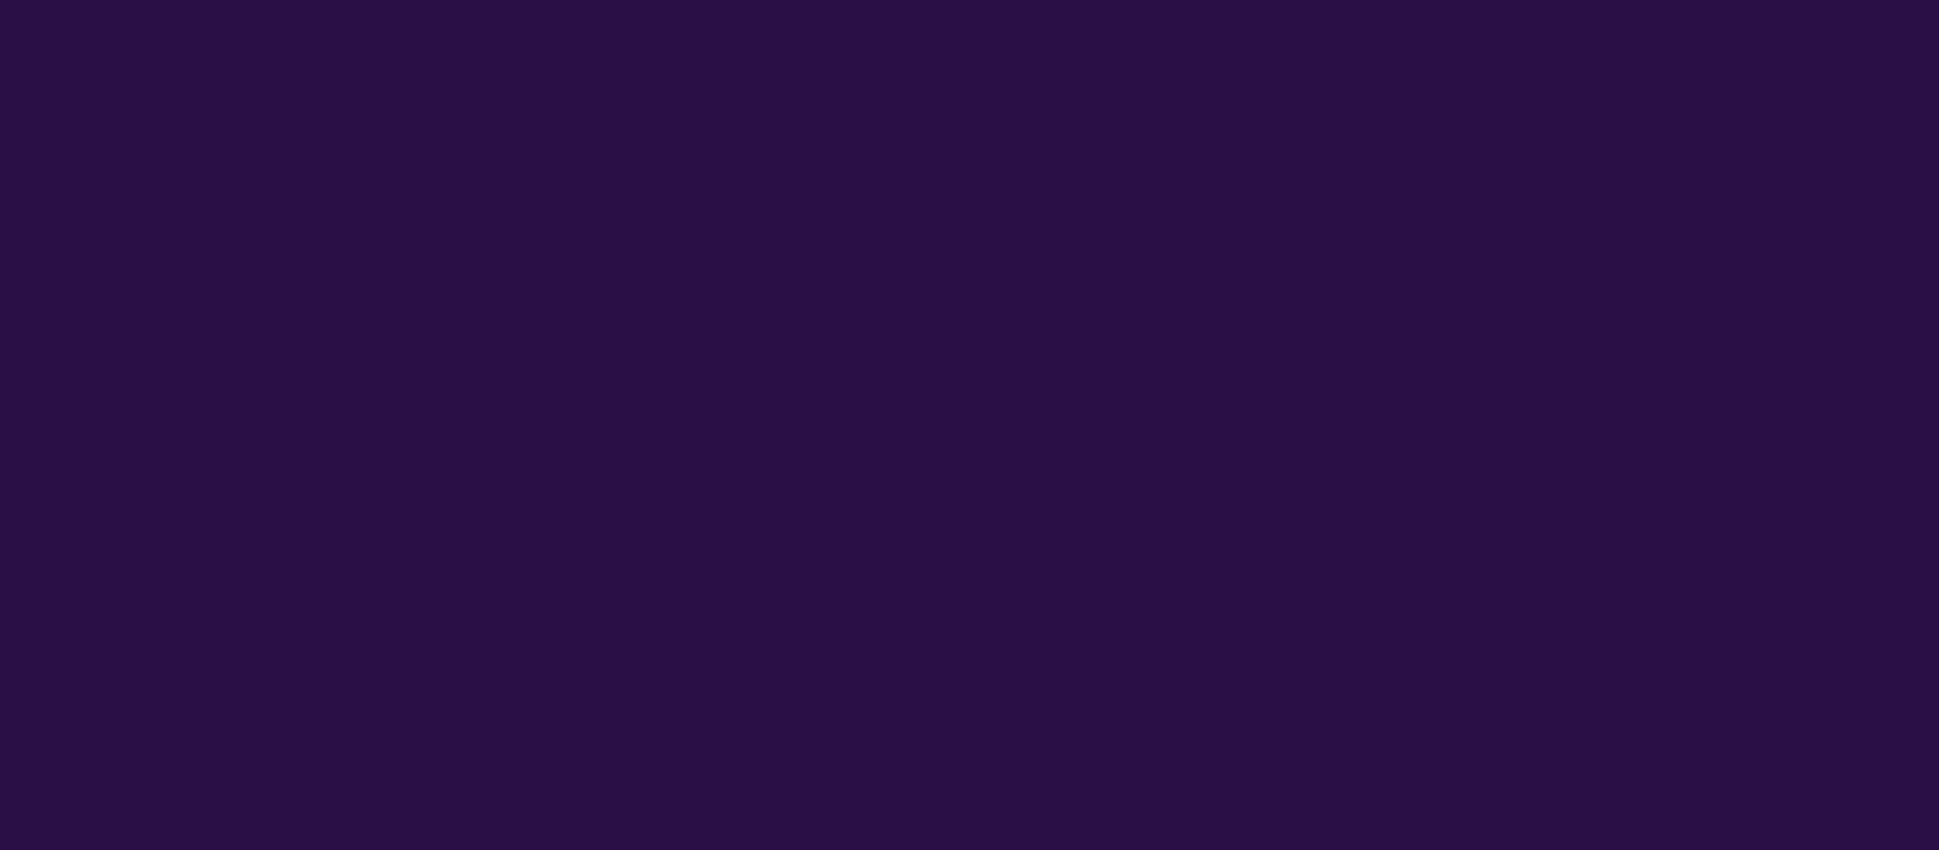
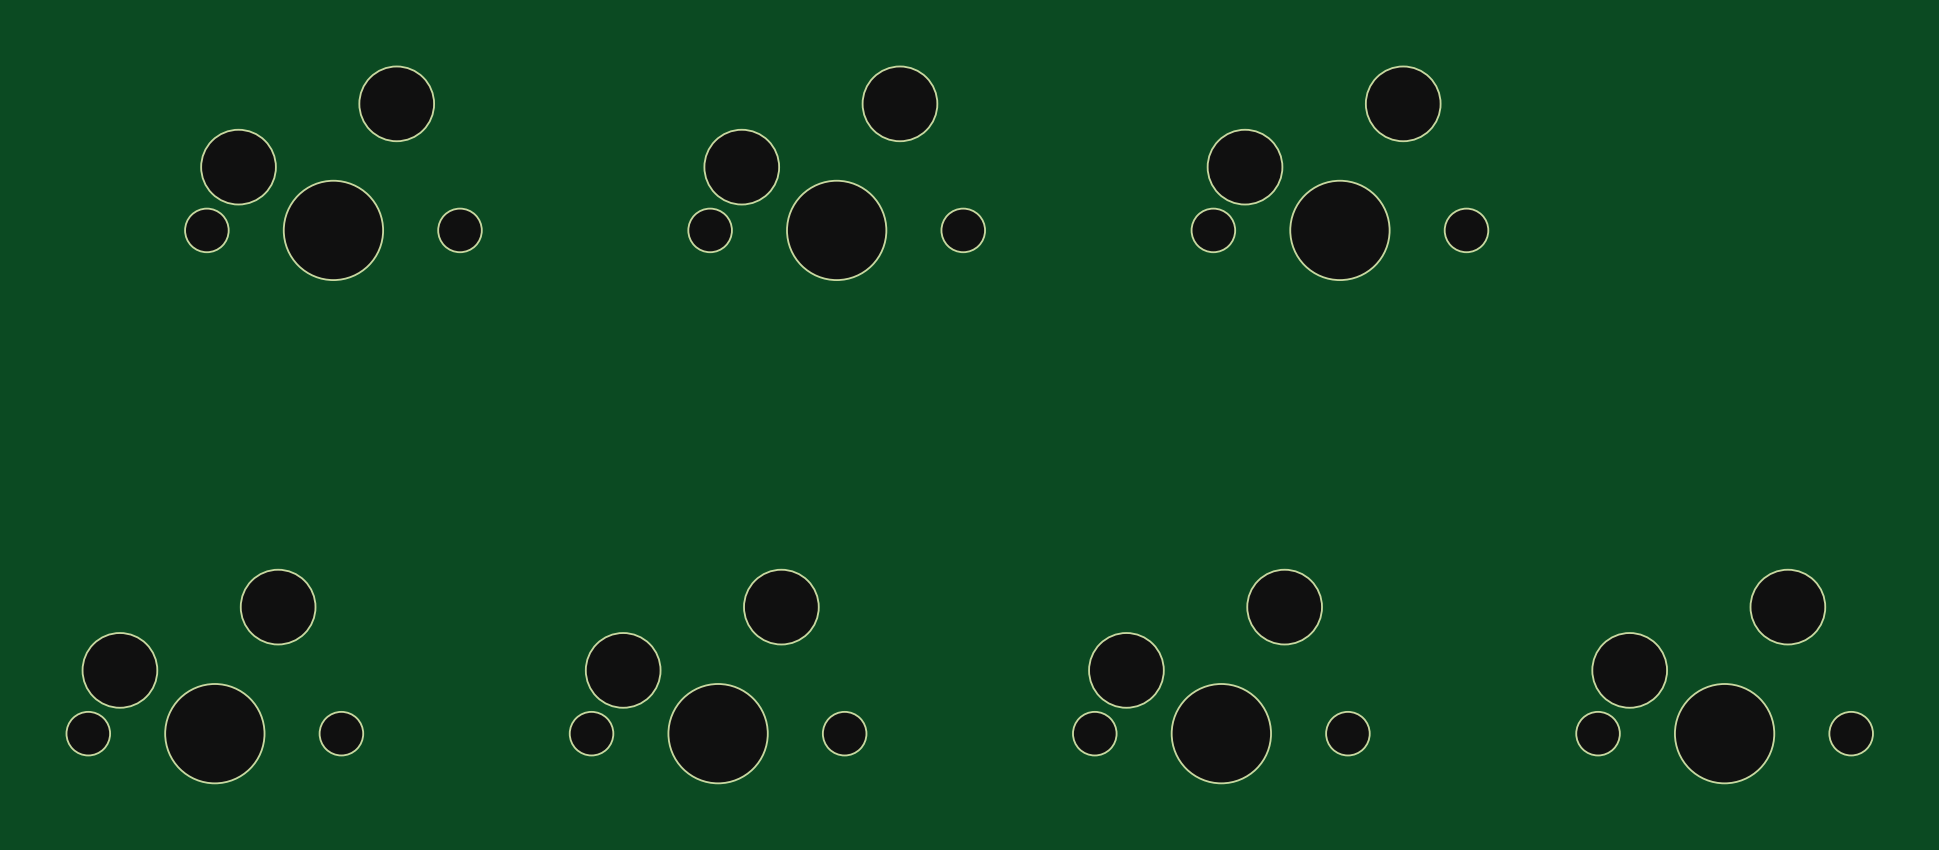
part: none -> (333, 173)
part: none -> (836, 173)
part: none -> (1339, 173)
part: none -> (214, 676)
part: none -> (718, 676)
part: none -> (1221, 676)
part: none -> (1724, 676)

